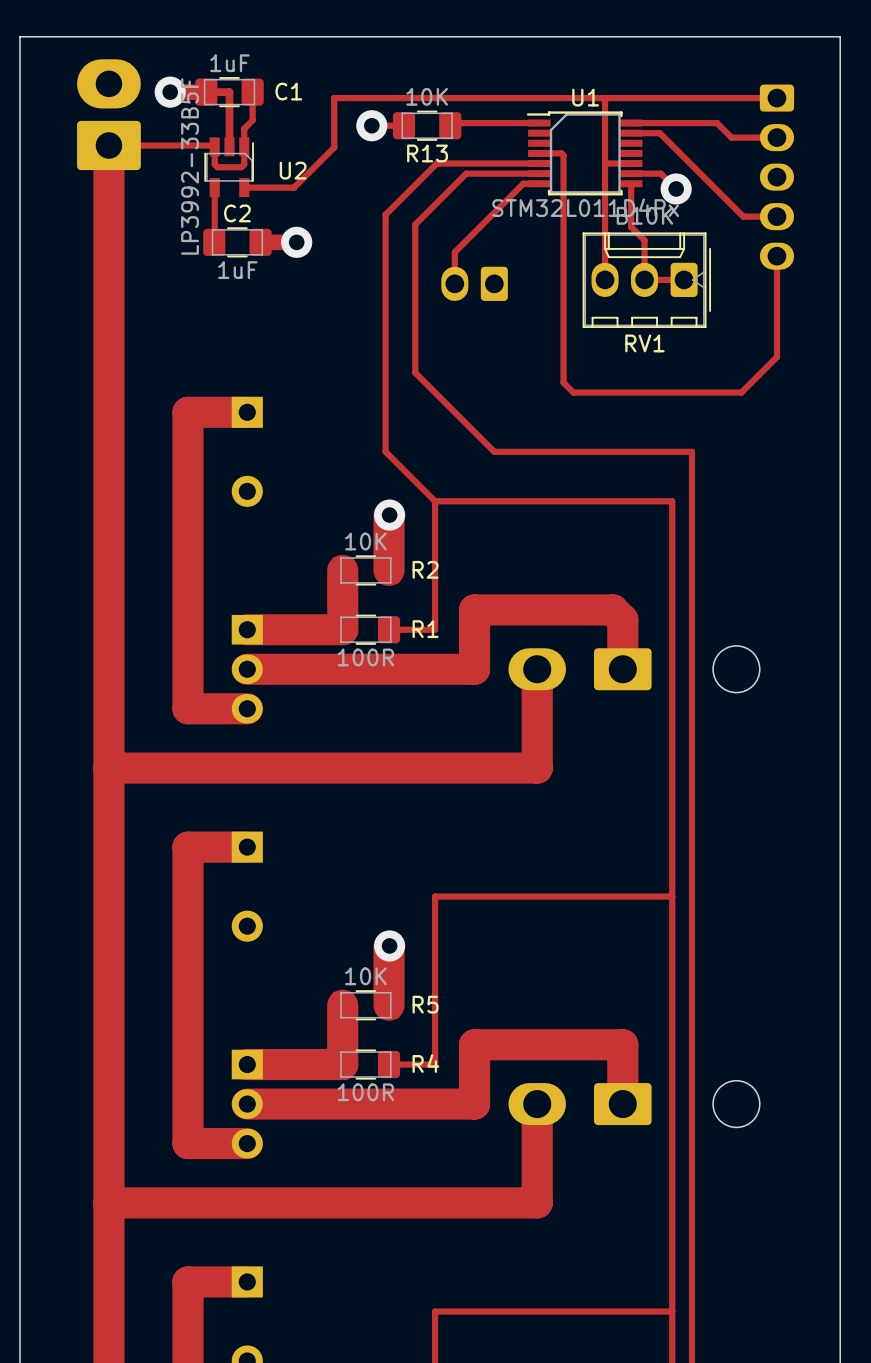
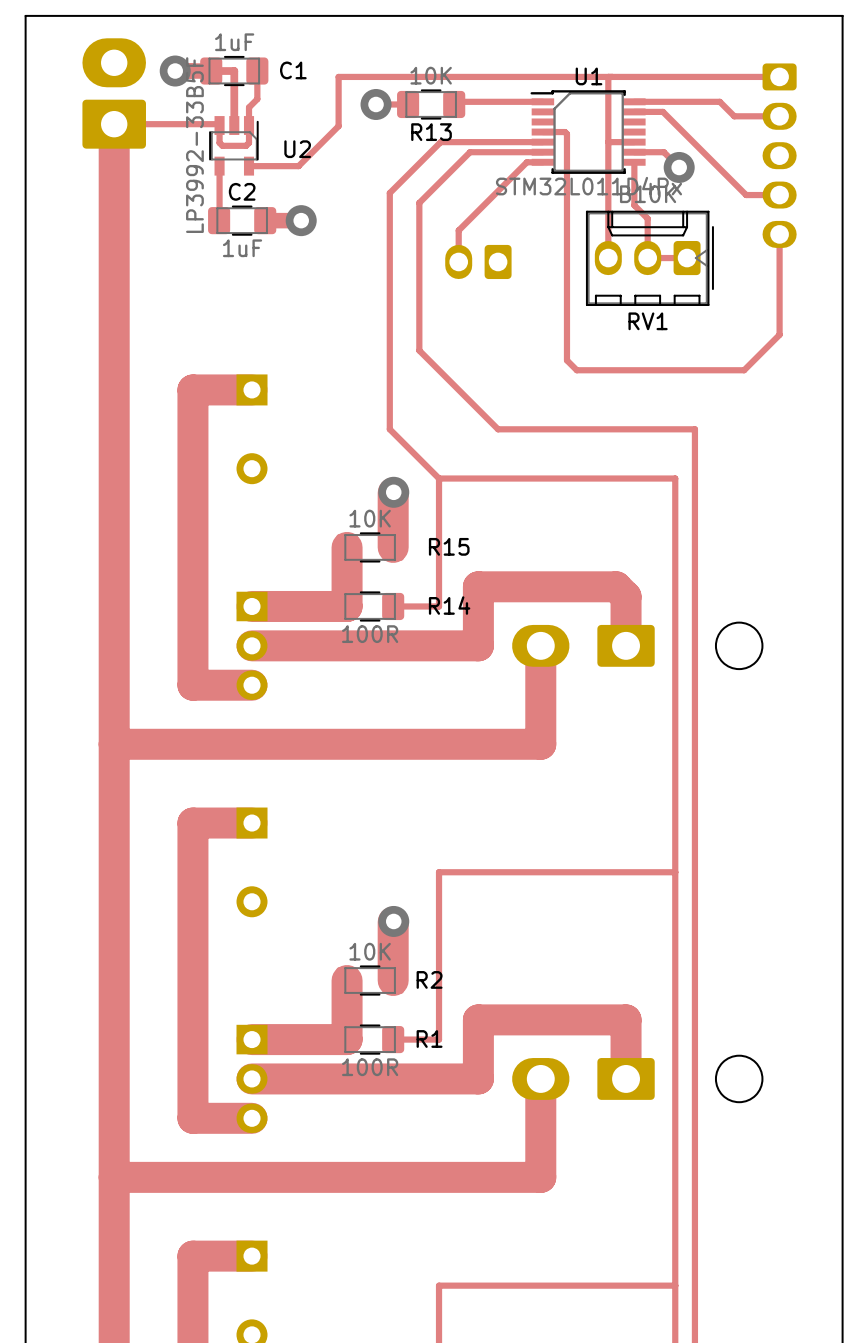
R2 name: R2 (425, 569) -> R15 (449, 546)
R1 name: R1 (425, 629) -> R14 (449, 605)
R5 name: R5 (425, 1004) -> R2 (429, 979)
R4 name: R4 (425, 1063) -> R1 (429, 1039)

